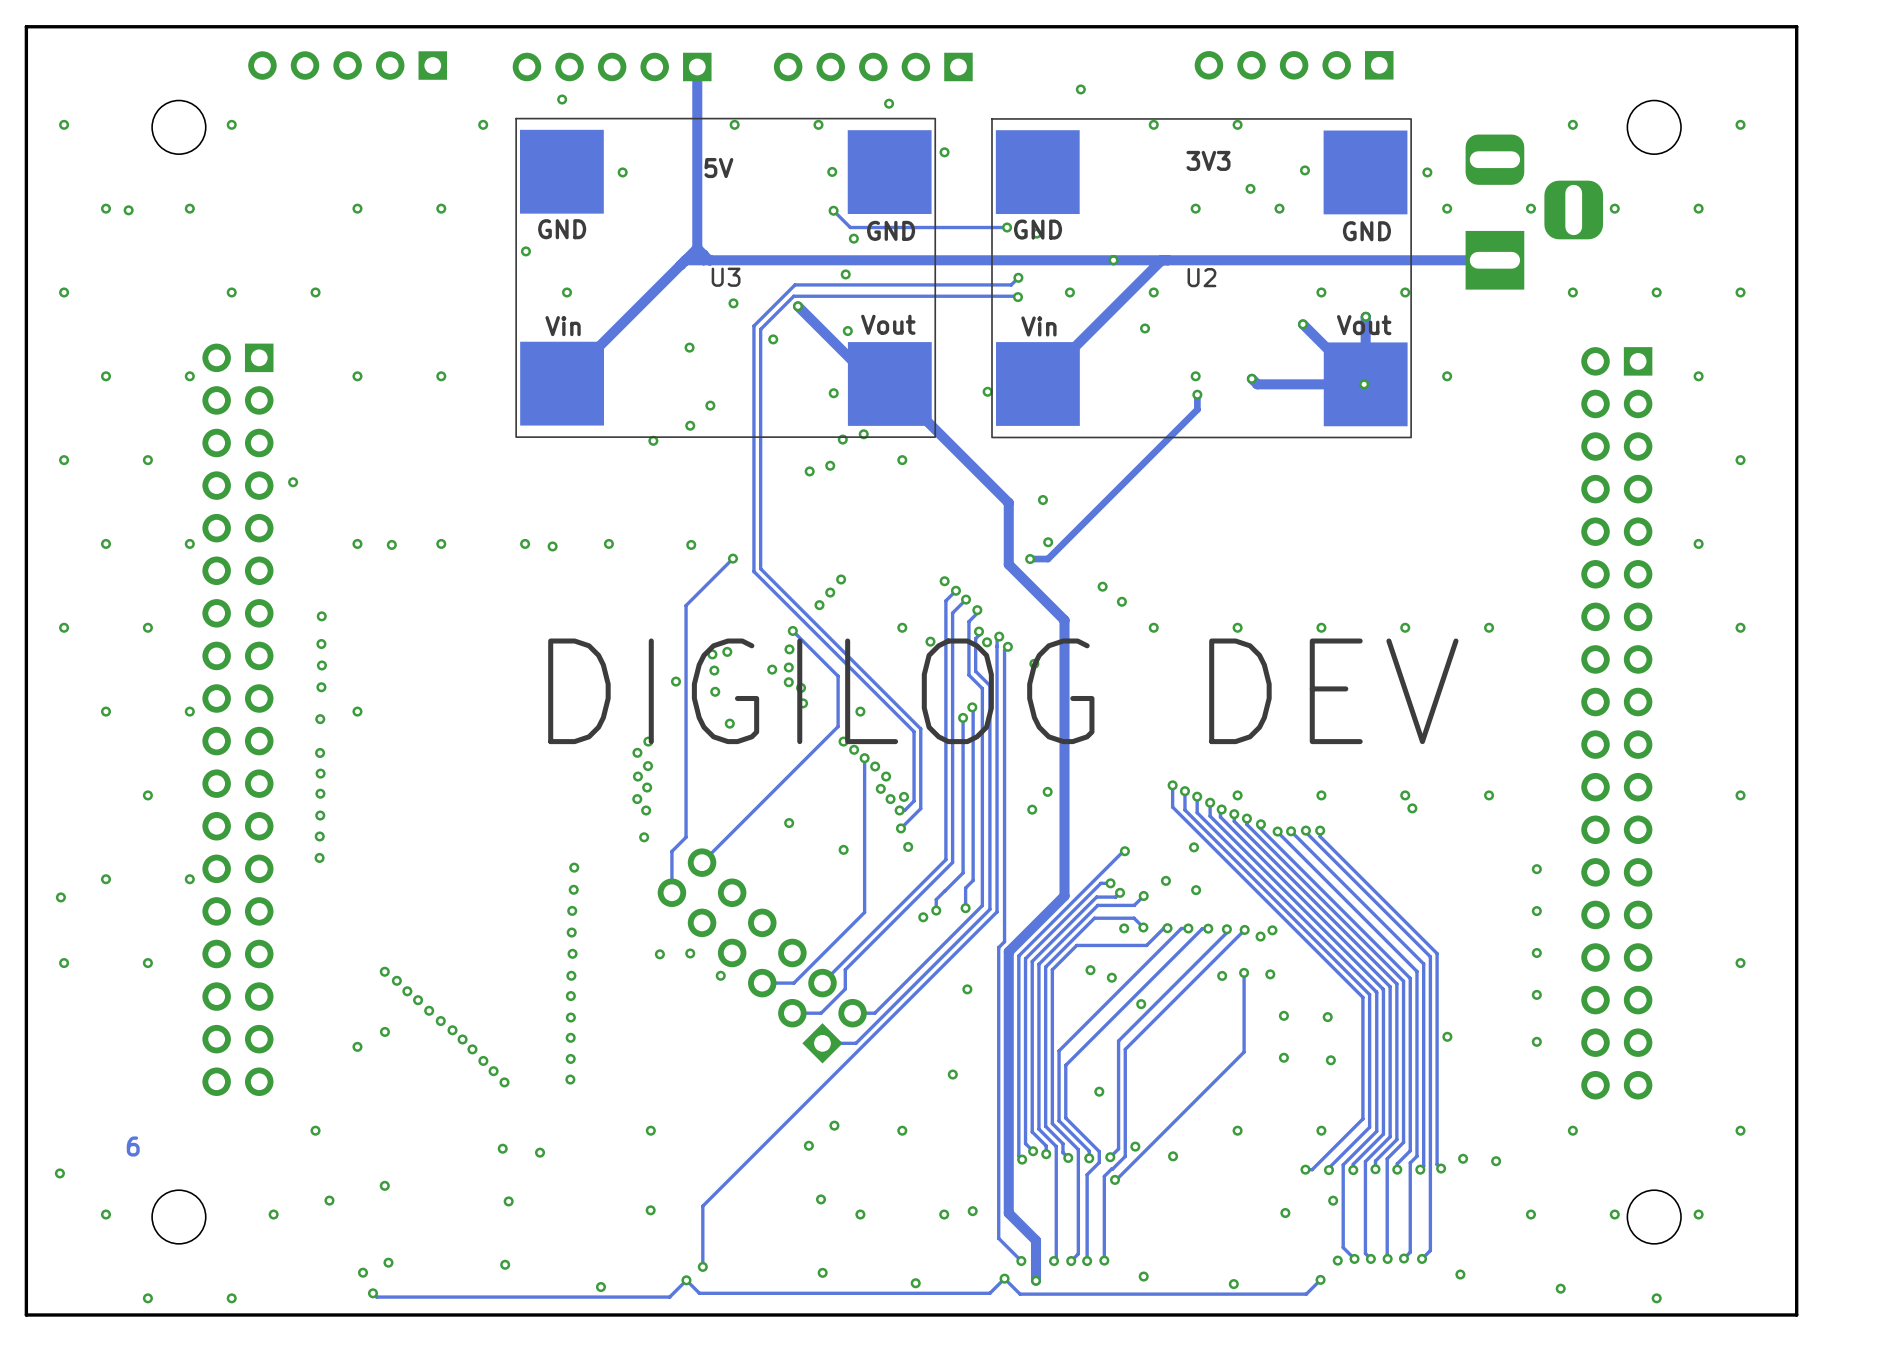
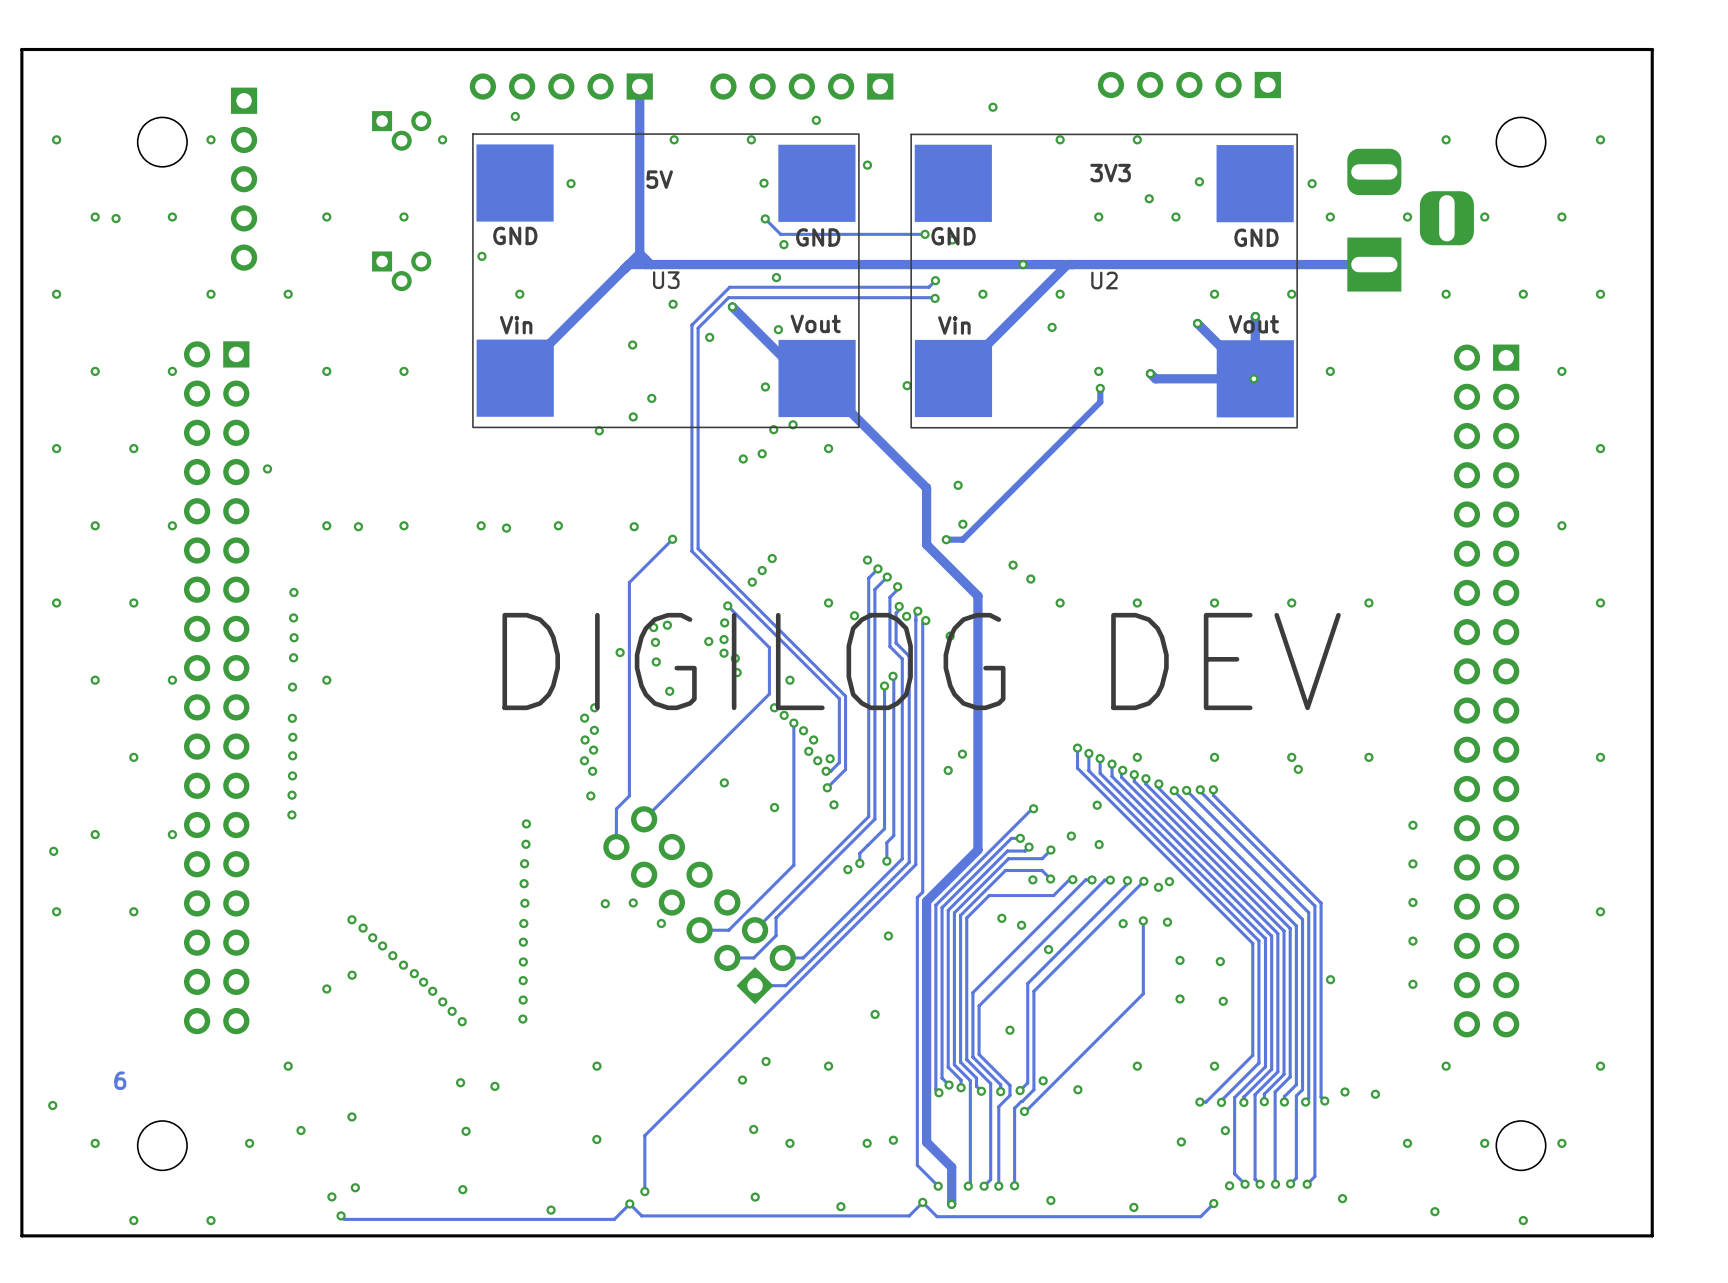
part rotation: 0° (347, 65) -> 90° counterclockwise (244, 179)
part position: (347, 65) -> (244, 179)
part: none -> (401, 130)
part: none -> (401, 271)

